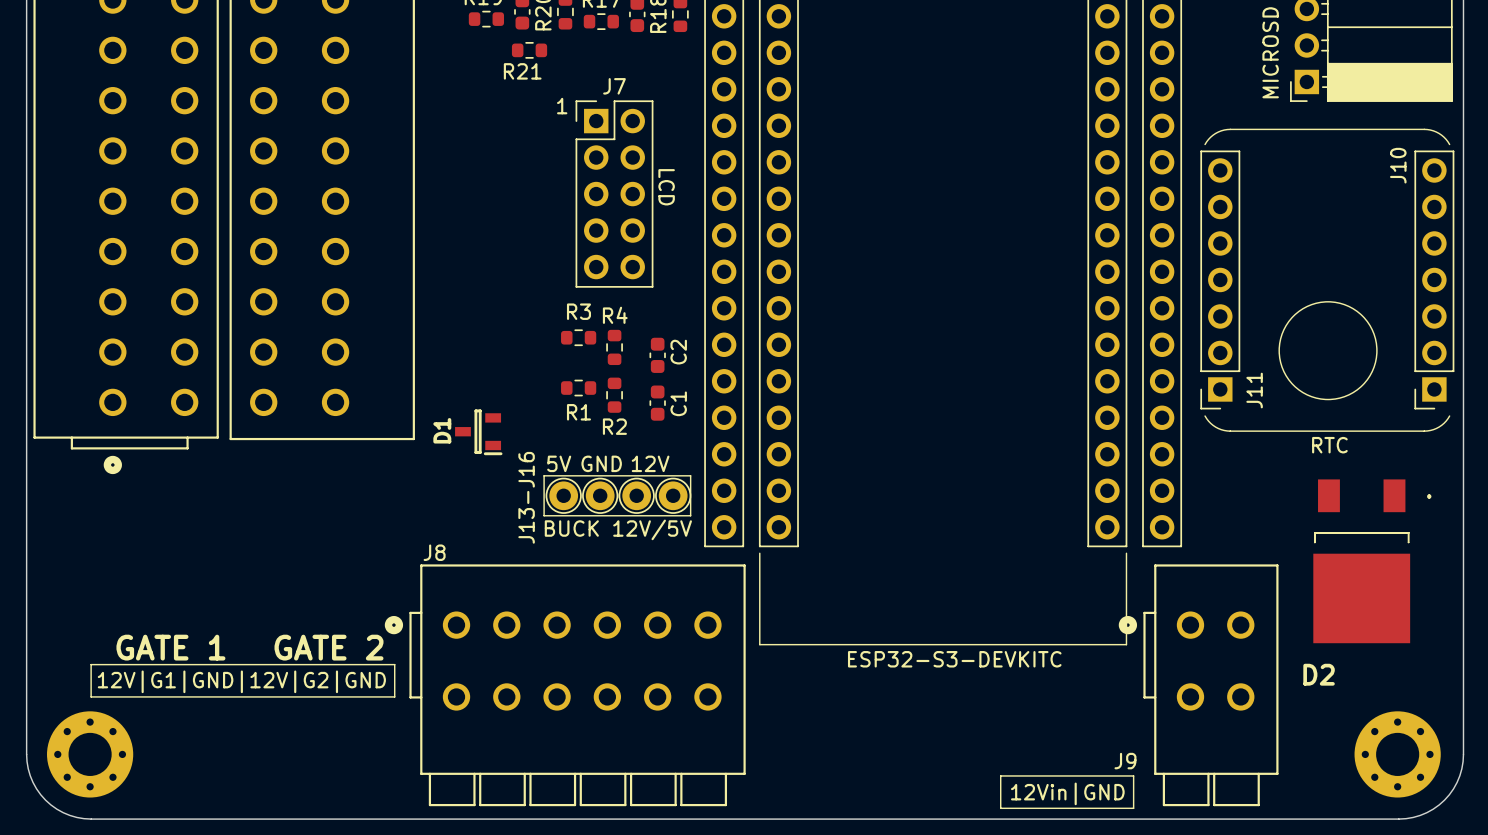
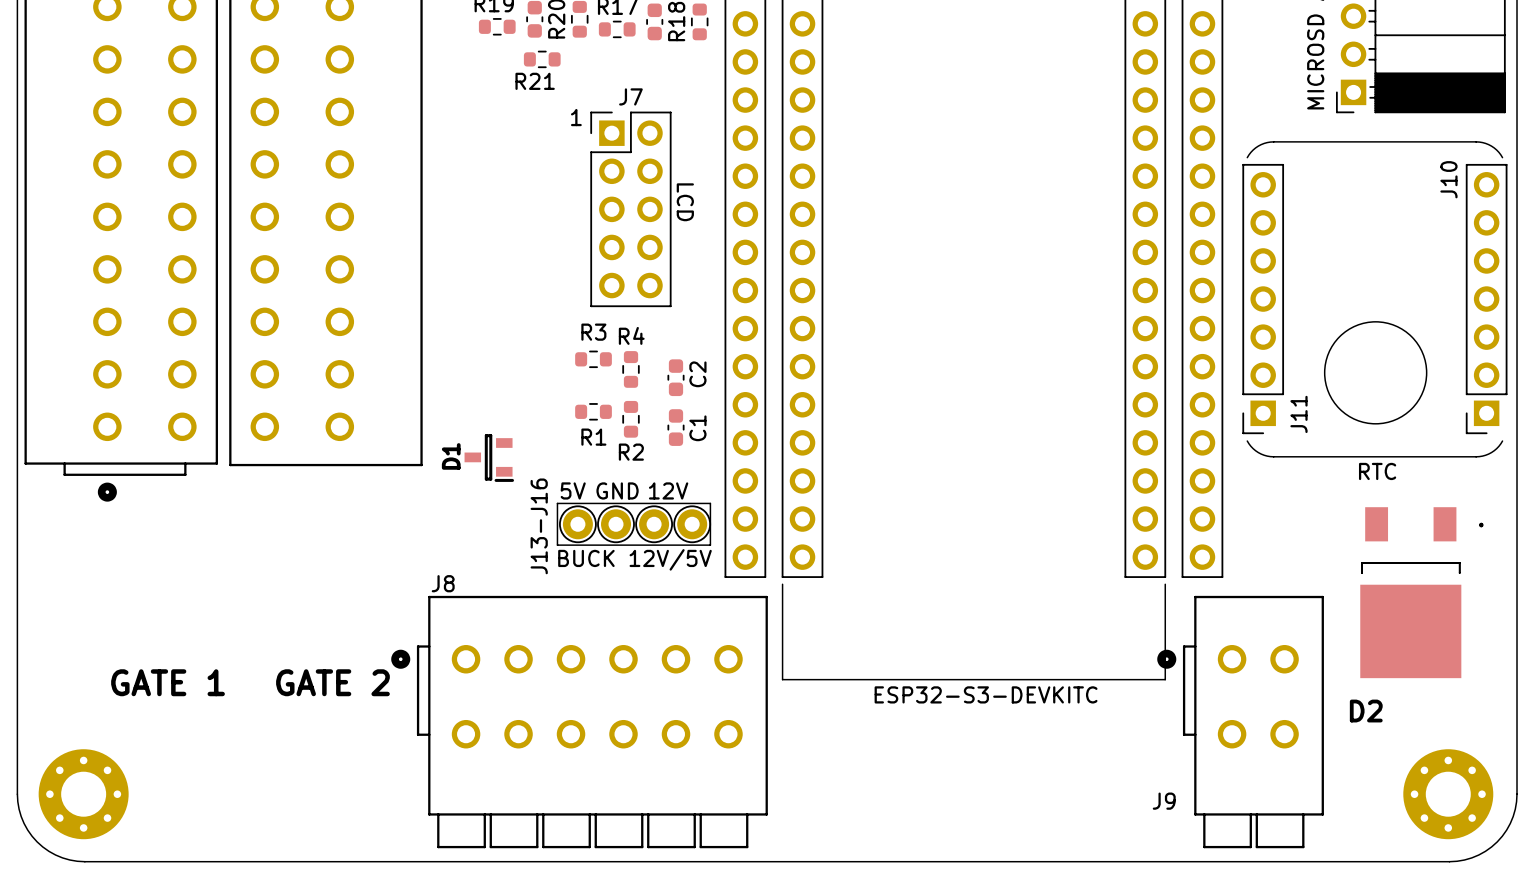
line: (91, 664) (394, 664) (394, 696) (91, 696) (91, 664) -> none
text: 12V|G1|GND|12V|G2|GND (241, 681) -> none
line: (1000, 775) (1133, 775) (1133, 808) (1000, 808) (1000, 775) -> none
text: 12Vin|GND (1067, 793) -> none

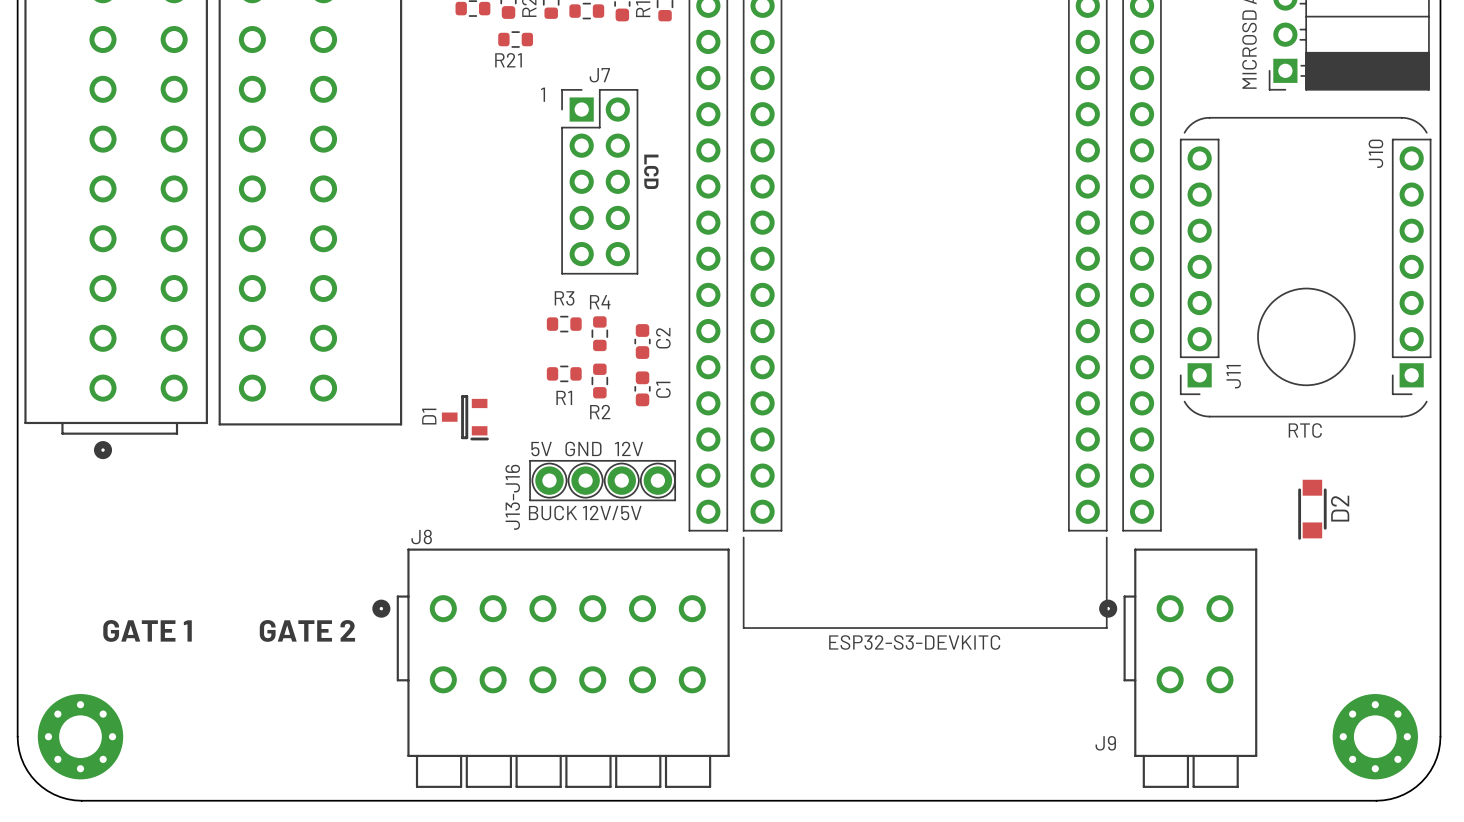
D2 footprint: [1360, 507, 1484, 679] -> [1298, 479, 1327, 540]
D2 name position: D2 (1366, 711) -> D2 (1340, 508)

